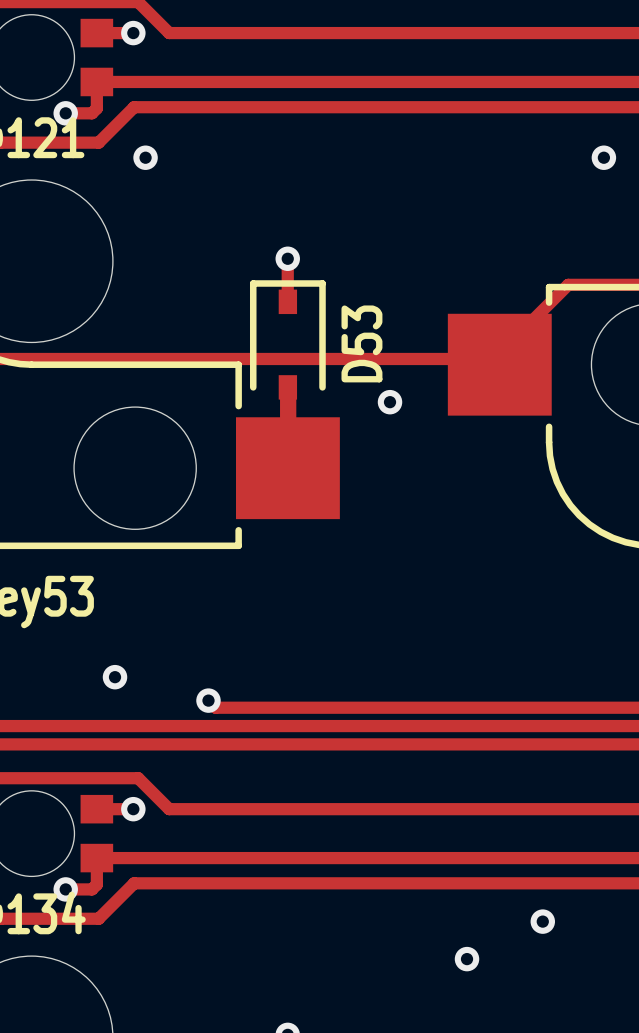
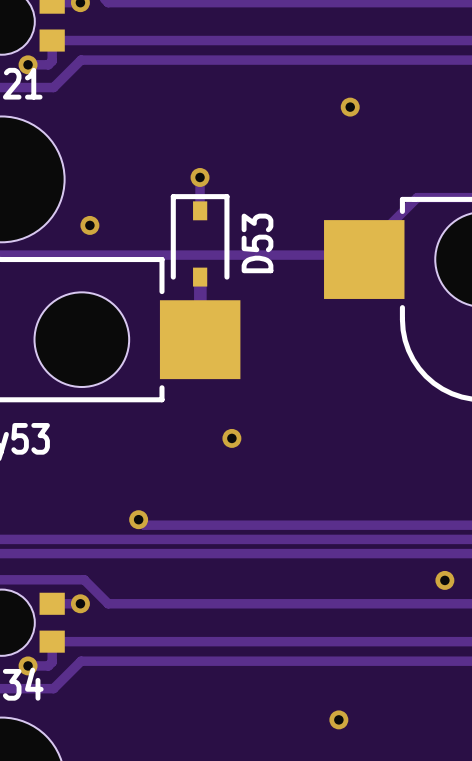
via: (145, 157) -> none
via position: (603, 157) -> (350, 107)
via: none -> (89, 225)
via: (390, 402) -> none
via: none -> (231, 438)
via: (115, 677) -> none
via: none -> (444, 580)
via: (542, 921) -> none

